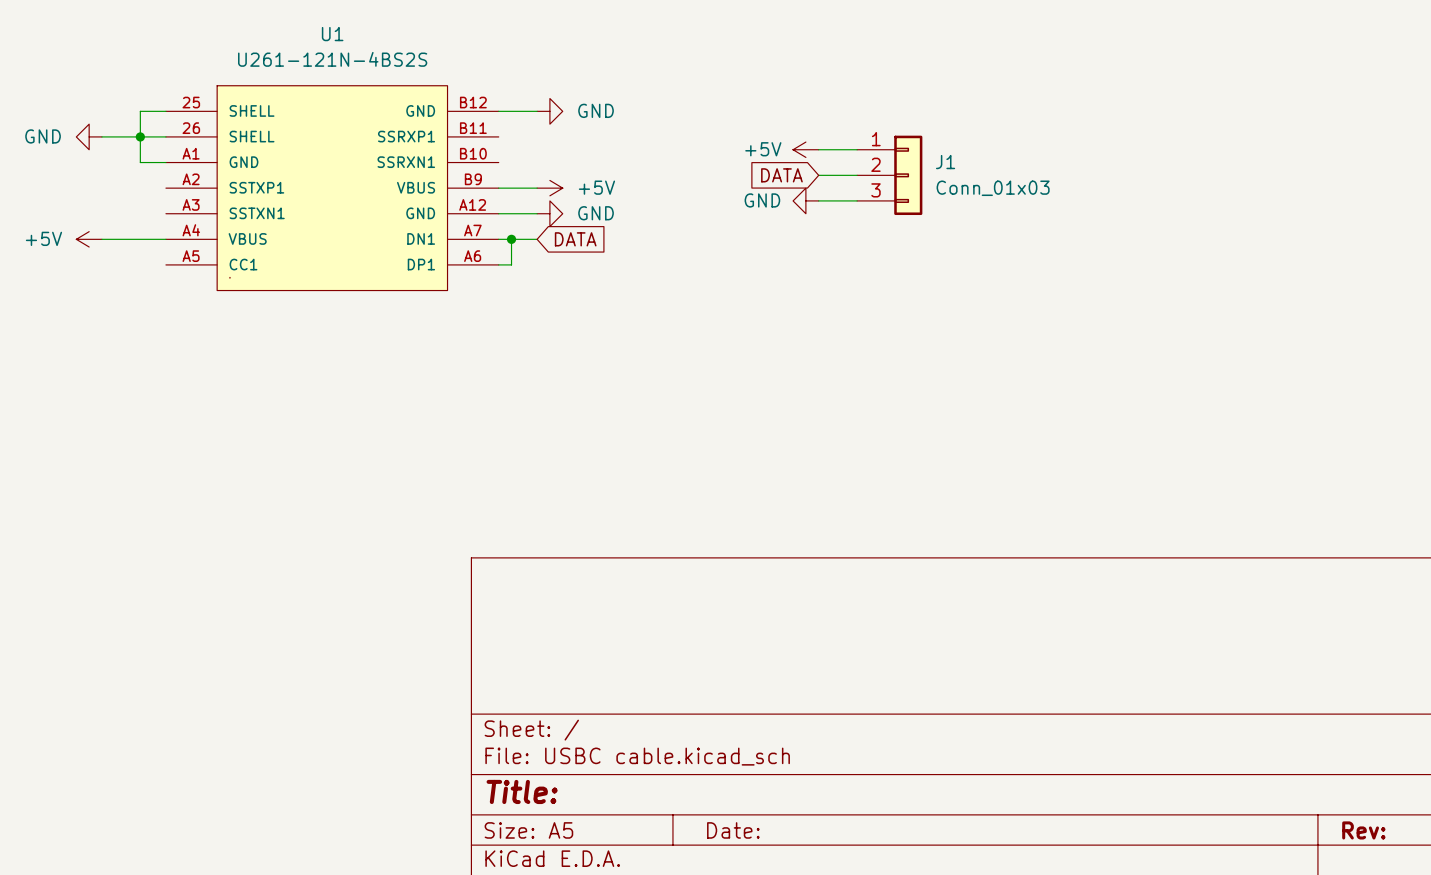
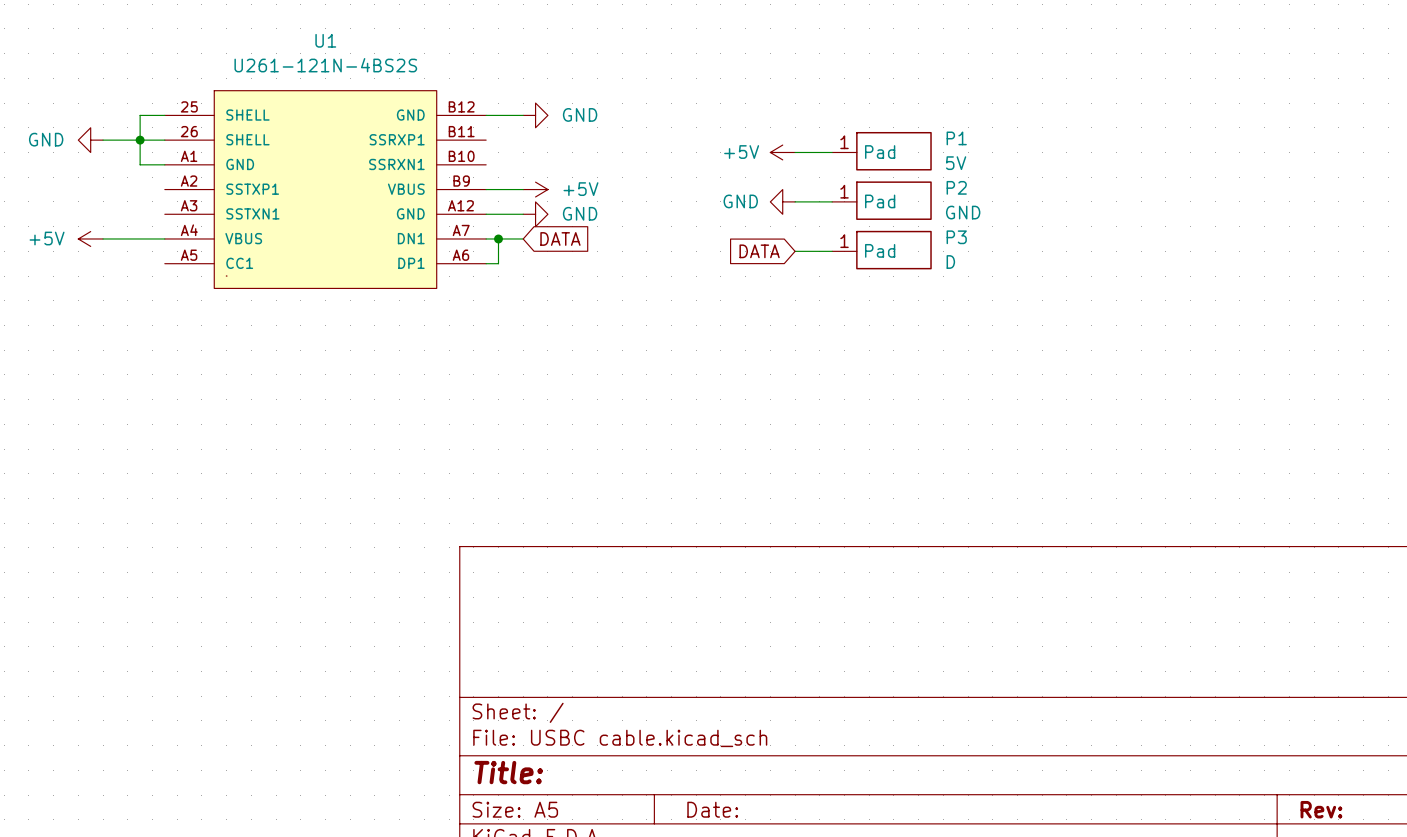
P1: none -> 5V (881, 151)
global label position: DATA (781, 175) -> DATA (759, 251)
wire: (818, 175) (857, 175) -> (795, 251) (832, 251)
J1: Conn_01x03 (889, 175) -> none
P2: none -> GND (881, 200)
P3: none -> D (881, 250)

